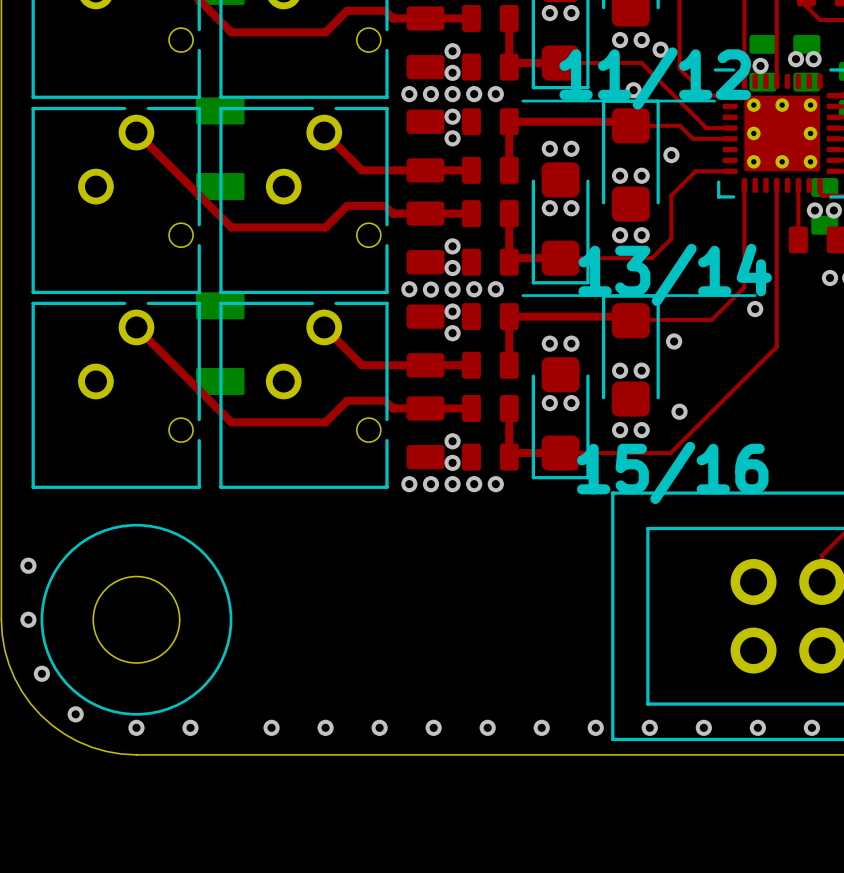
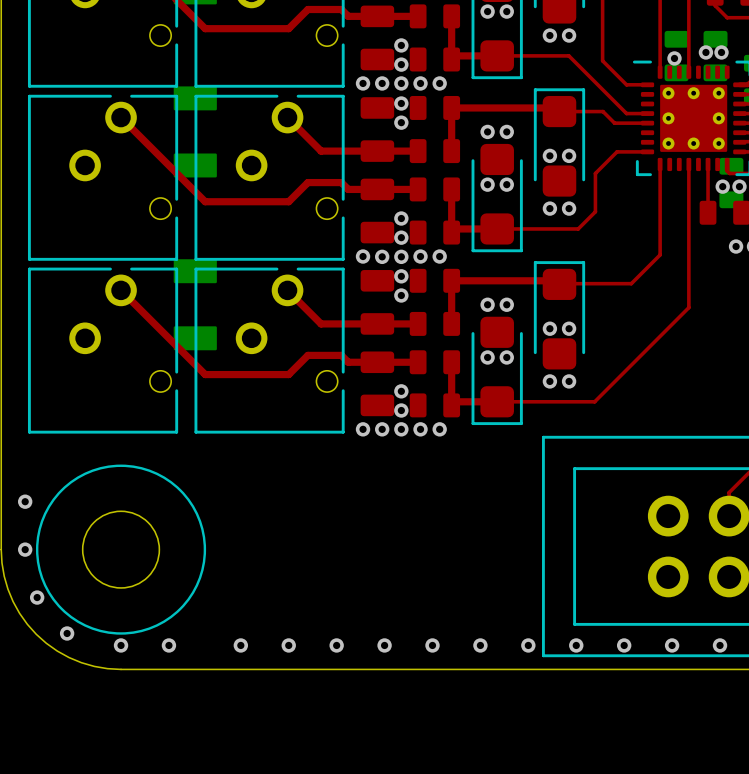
via: (660, 49) -> none
text: 11/12 (655, 78) -> none
via: (633, 90) -> none
line: (522, 101) (714, 101) -> none
via: (671, 155) -> none
text: 13/14 (675, 274) -> none
line: (522, 295) (755, 295) -> none
via: (755, 309) -> none
via: (674, 341) -> none
via: (679, 411) -> none
text: 15/16 (672, 472) -> none

